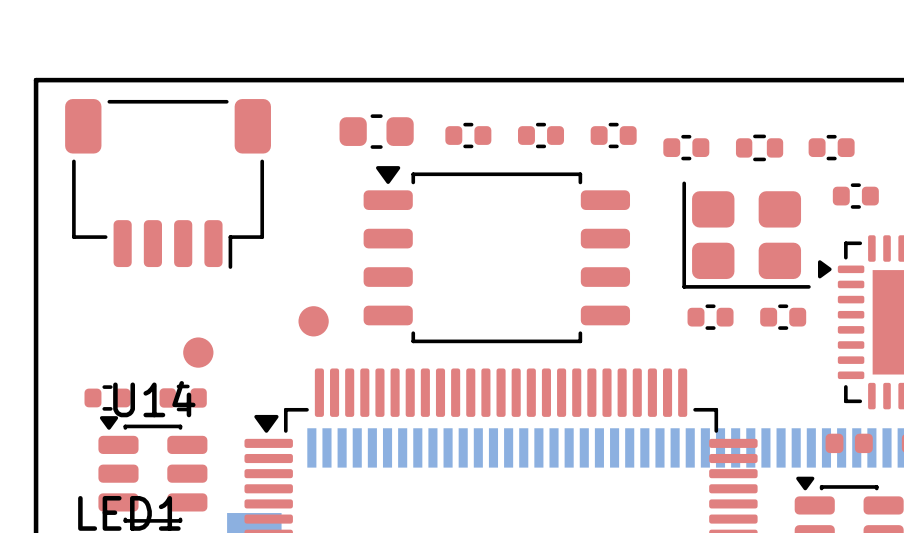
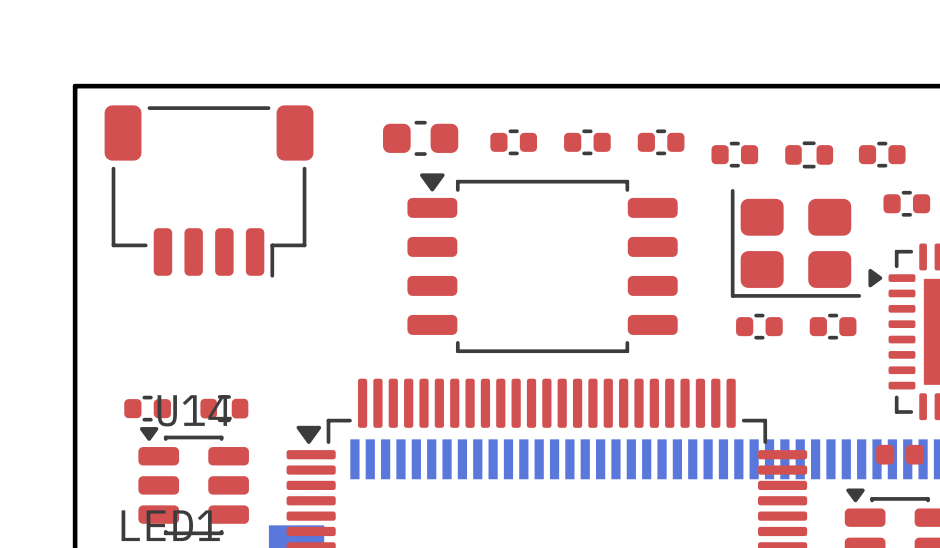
part: (313, 321) -> none
part: (198, 352) -> none

